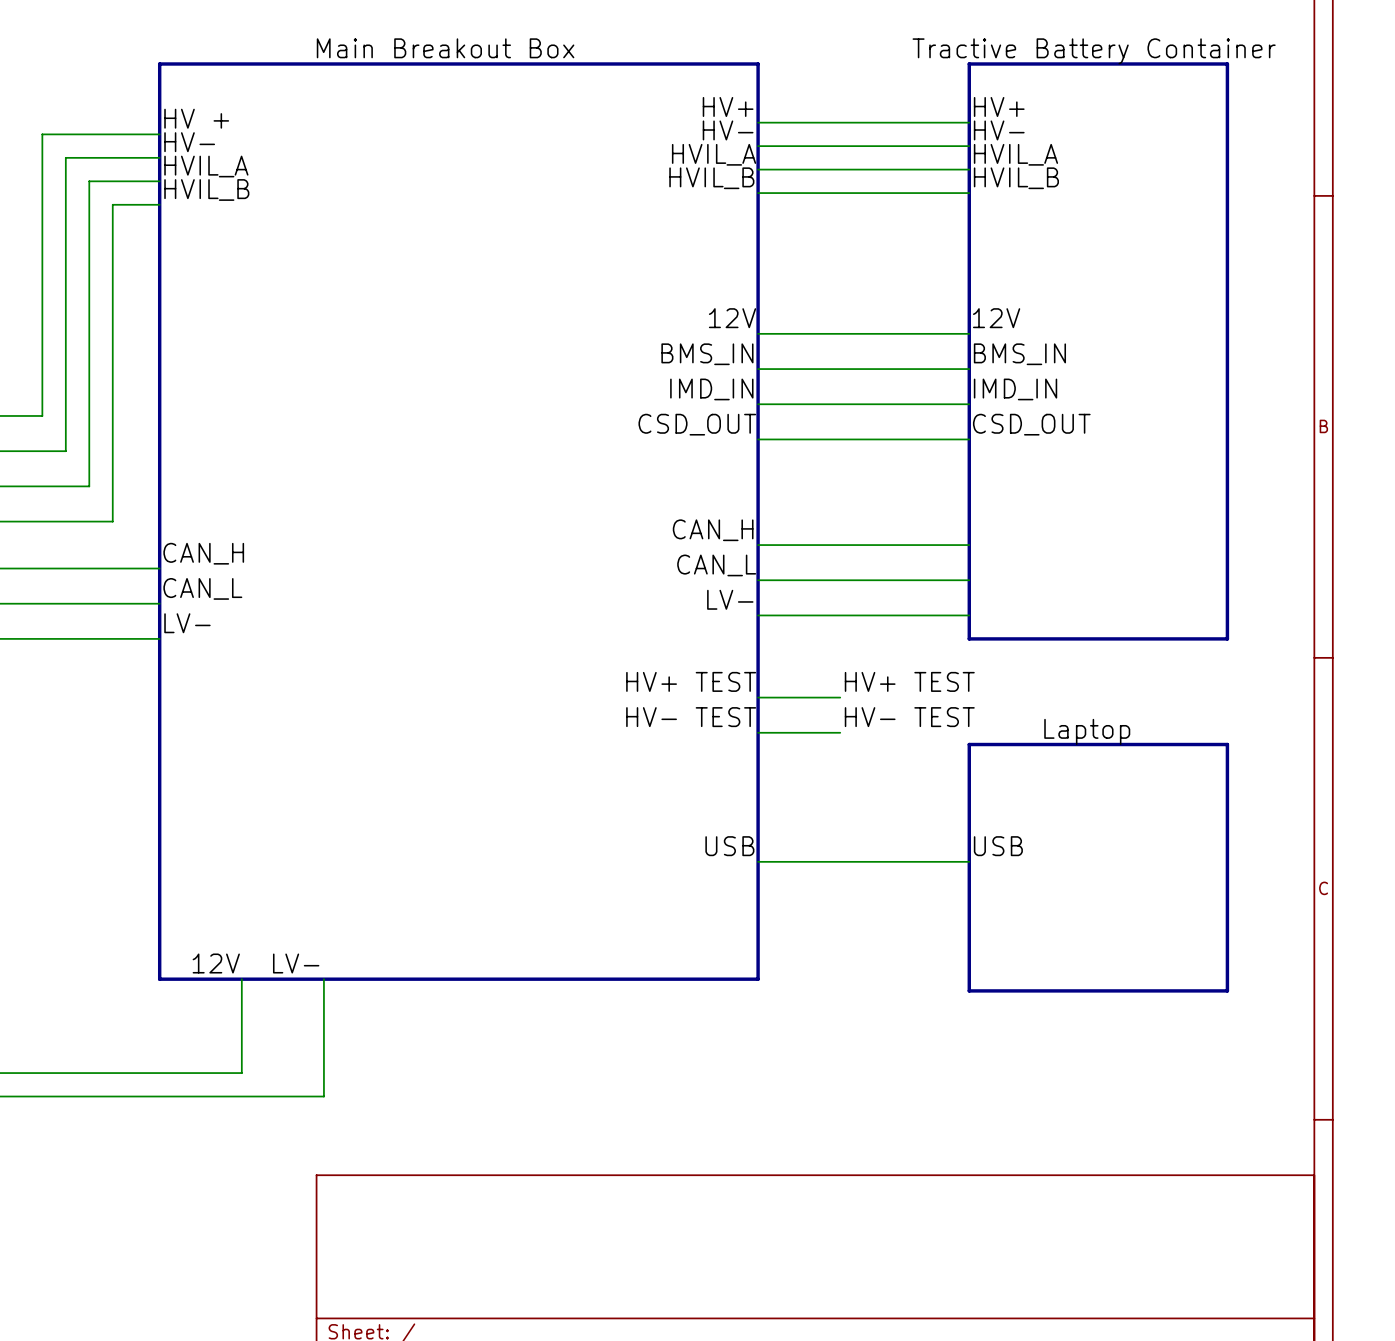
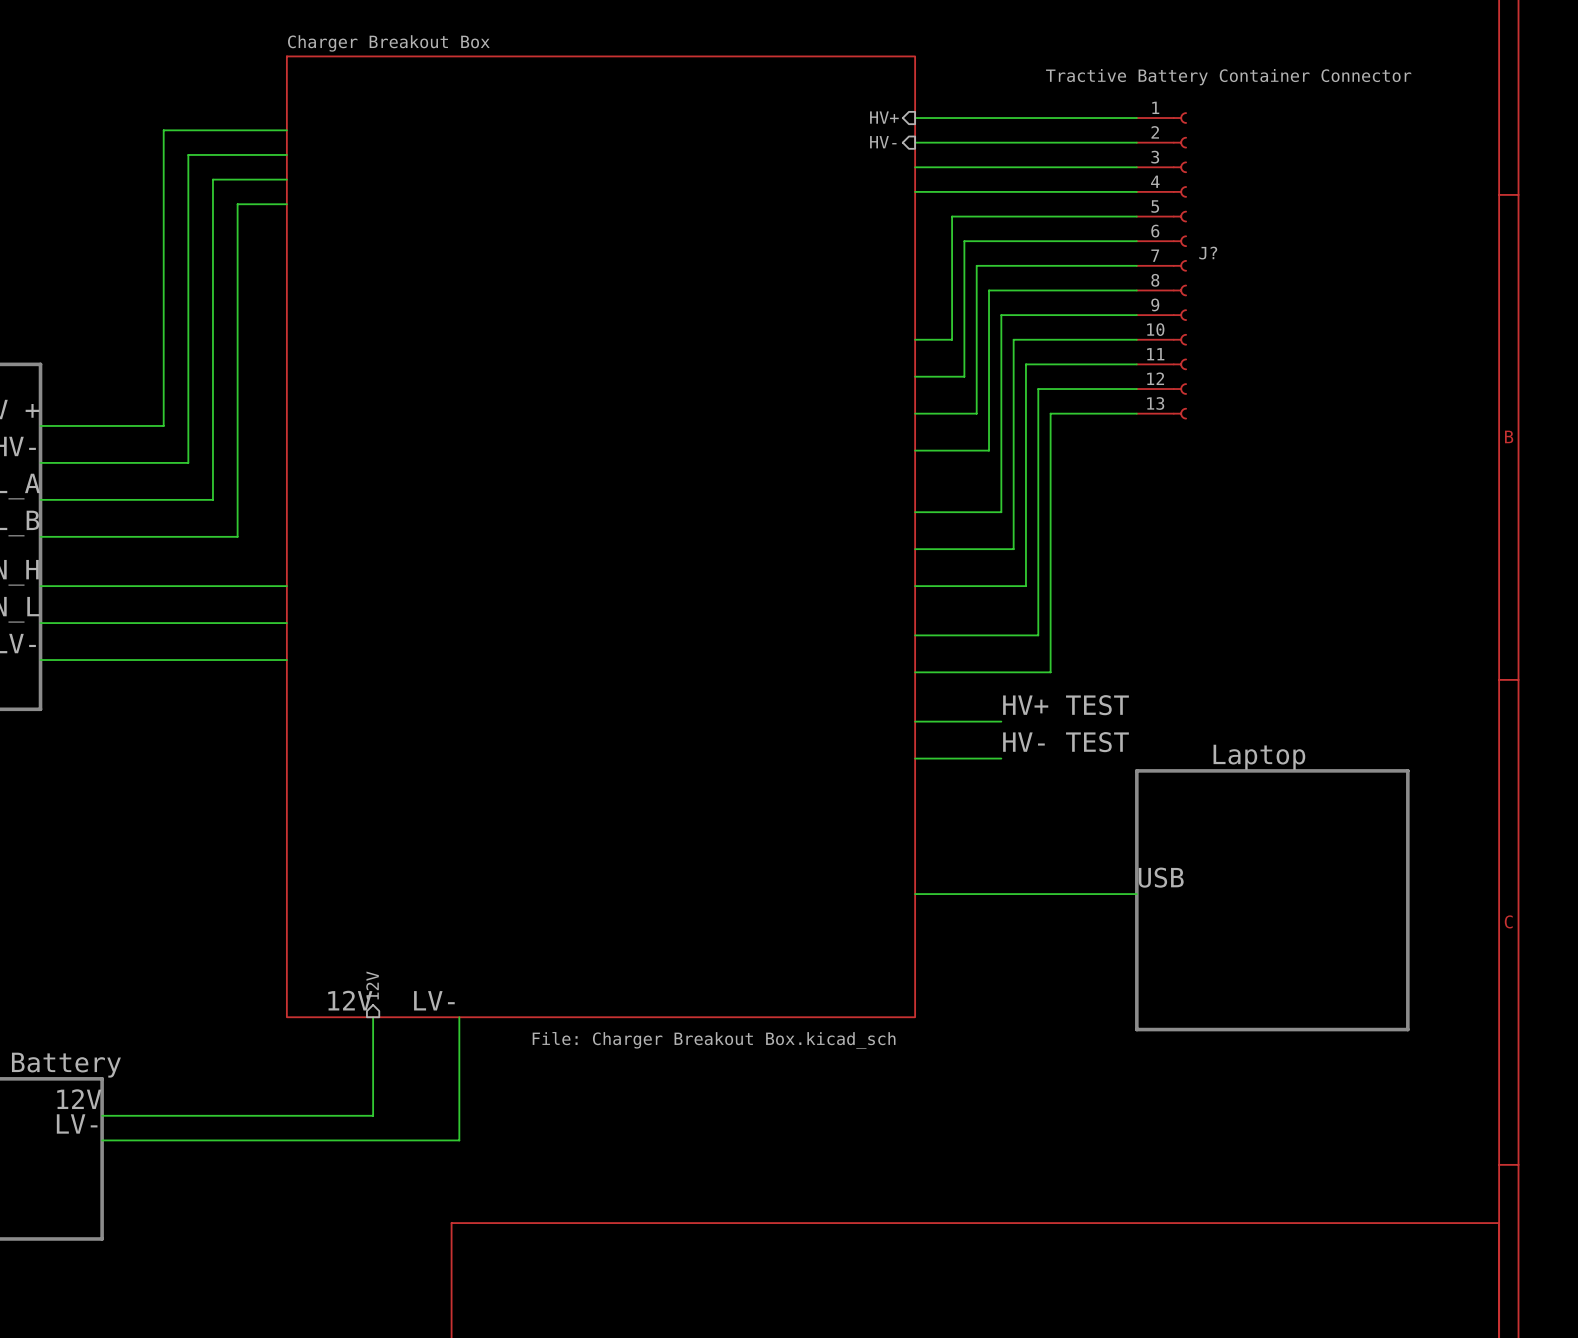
label: Main Breakout Box (445, 48) -> none
label: Tractive Battery Container (1094, 51) -> none
line: (159, 63) (758, 63) (758, 979) (159, 979) (159, 63) -> none
line: (969, 63) (969, 638) (1227, 638) (1227, 63) (969, 63) -> none
label: HV+ (728, 106) -> none
label: HV+ (999, 106) -> none
label: HV + (196, 118) -> none
sheet pin: none -> HV+ (884, 117)
label: HV- (728, 130) -> none
label: HV- (999, 130) -> none
label: HV- (189, 142) -> none
sheet pin: none -> HV- (883, 142)
label: HVIL_A (714, 154) -> none
label: HVIL_A (1015, 154) -> none
label: HVIL_A (206, 166) -> none
label: HVIL_B (711, 178) -> none
label: HVIL_B (1016, 178) -> none
label: HVIL_B (206, 189) -> none
J?: none -> Tractive Battery Container Connector (1161, 265)
wire: none -> (1136, 315) (1001, 315) (1001, 512) (915, 512)
label: 12V (732, 318) -> none
label: 12V (996, 318) -> none
wire: (793, 333) (851, 333) -> (952, 339) (952, 216) (1136, 216)
wire: none -> (1013, 339) (1013, 549) (915, 549)
label: BMS_IN (707, 354) -> none
label: BMS_IN (1019, 354) -> none
wire: none -> (1136, 364) (1025, 364) (1025, 586) (915, 586)
wire: (805, 369) (969, 369) -> (964, 376) (964, 241) (1136, 241)
label: IMD_IN (711, 389) -> none
label: IMD_IN (1015, 389) -> none
wire: (816, 404) (887, 404) -> (976, 413) (976, 265) (1136, 265)
wire: none -> (1050, 413) (1050, 672) (915, 672)
label: CSD_OUT (697, 424) -> none
label: CSD_OUT (1031, 424) -> none
wire: (828, 439) (969, 439) -> (989, 450) (989, 290) (1136, 290)
sheet Charger Breakout Box: none -> File: Charger Breakout Box.kicad_sch (601, 536)
label: CAN_H (713, 530) -> none
wire: (758, 545) (969, 545) -> none
label: CAN_H (203, 553) -> none
label: CAN_L (716, 565) -> none
wire: (758, 580) (969, 580) -> none
label: CAN_L (202, 588) -> none
label: LV- (730, 599) -> none
wire: (875, 615) (969, 615) -> (1038, 635) (1038, 389) (1136, 389)
label: LV- (187, 623) -> none
label: HV+ TEST (691, 681) -> none
label: HV- TEST (691, 717) -> none
label: USB (729, 846) -> none
sheet pin: none -> 12V (372, 985)

